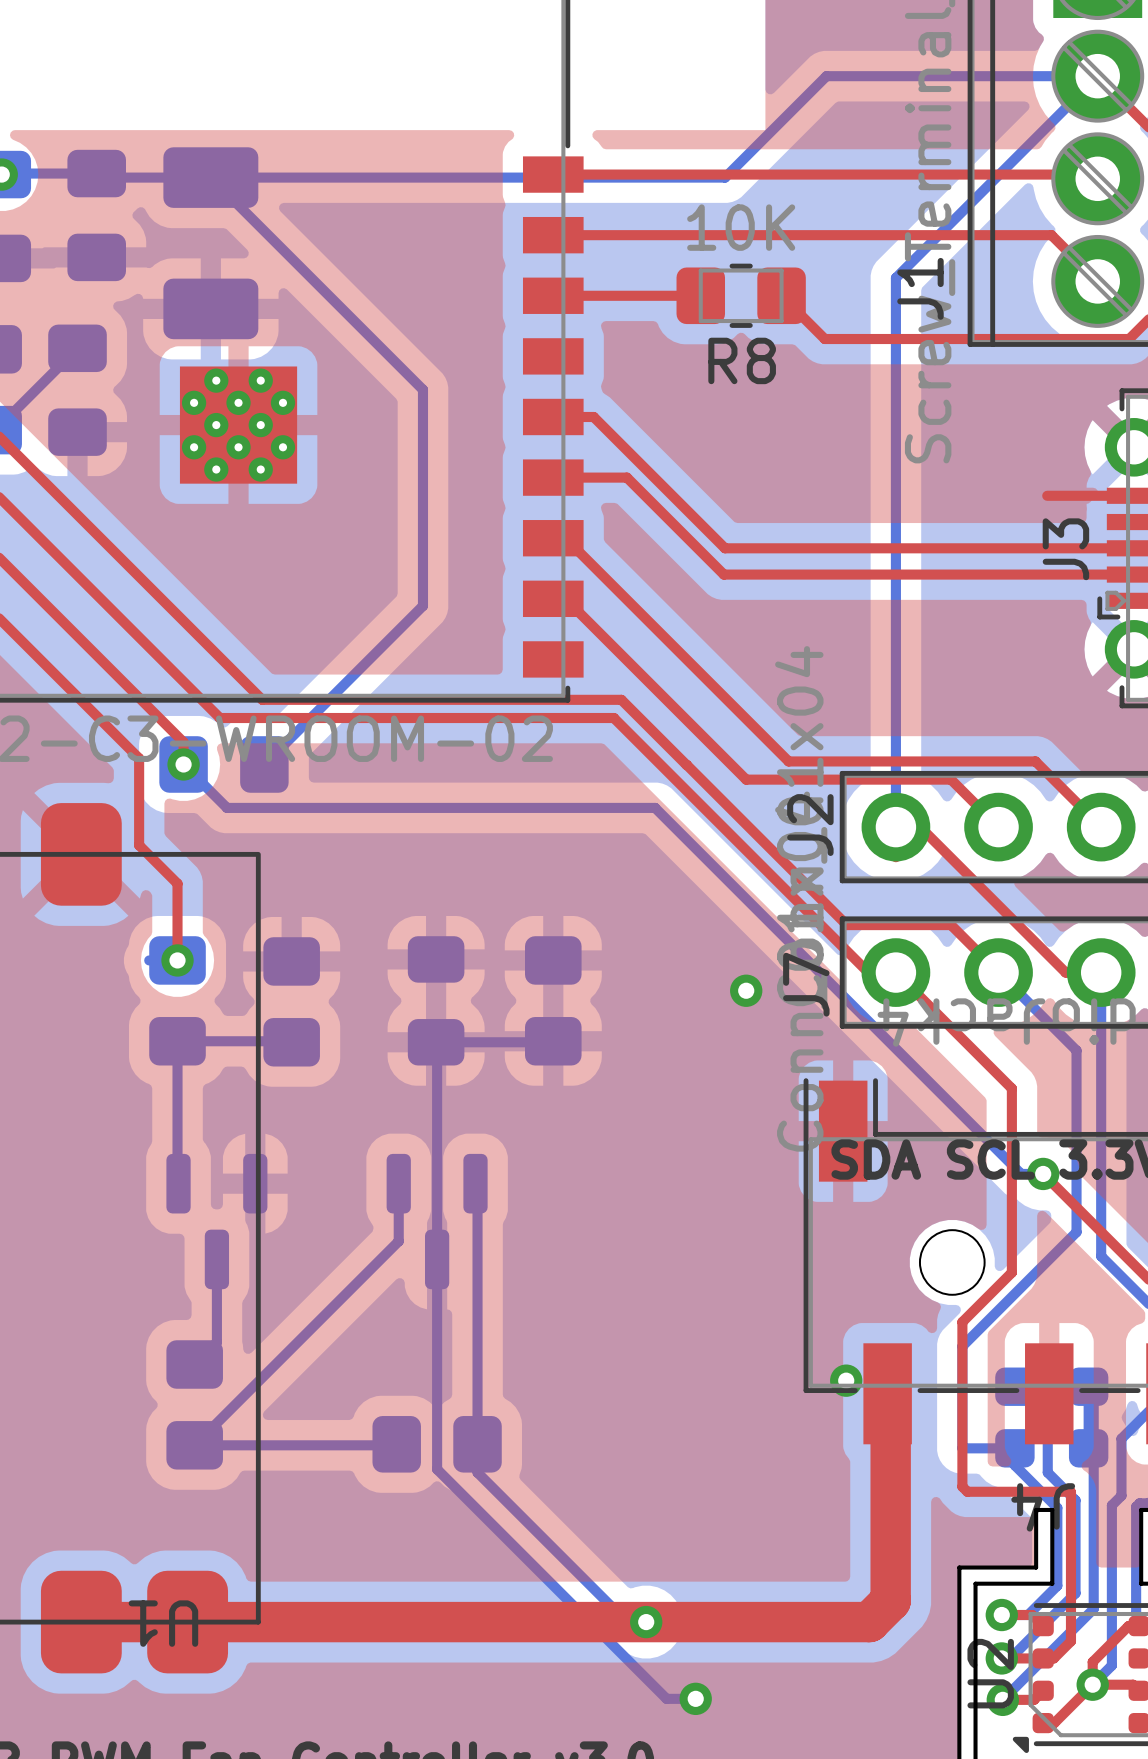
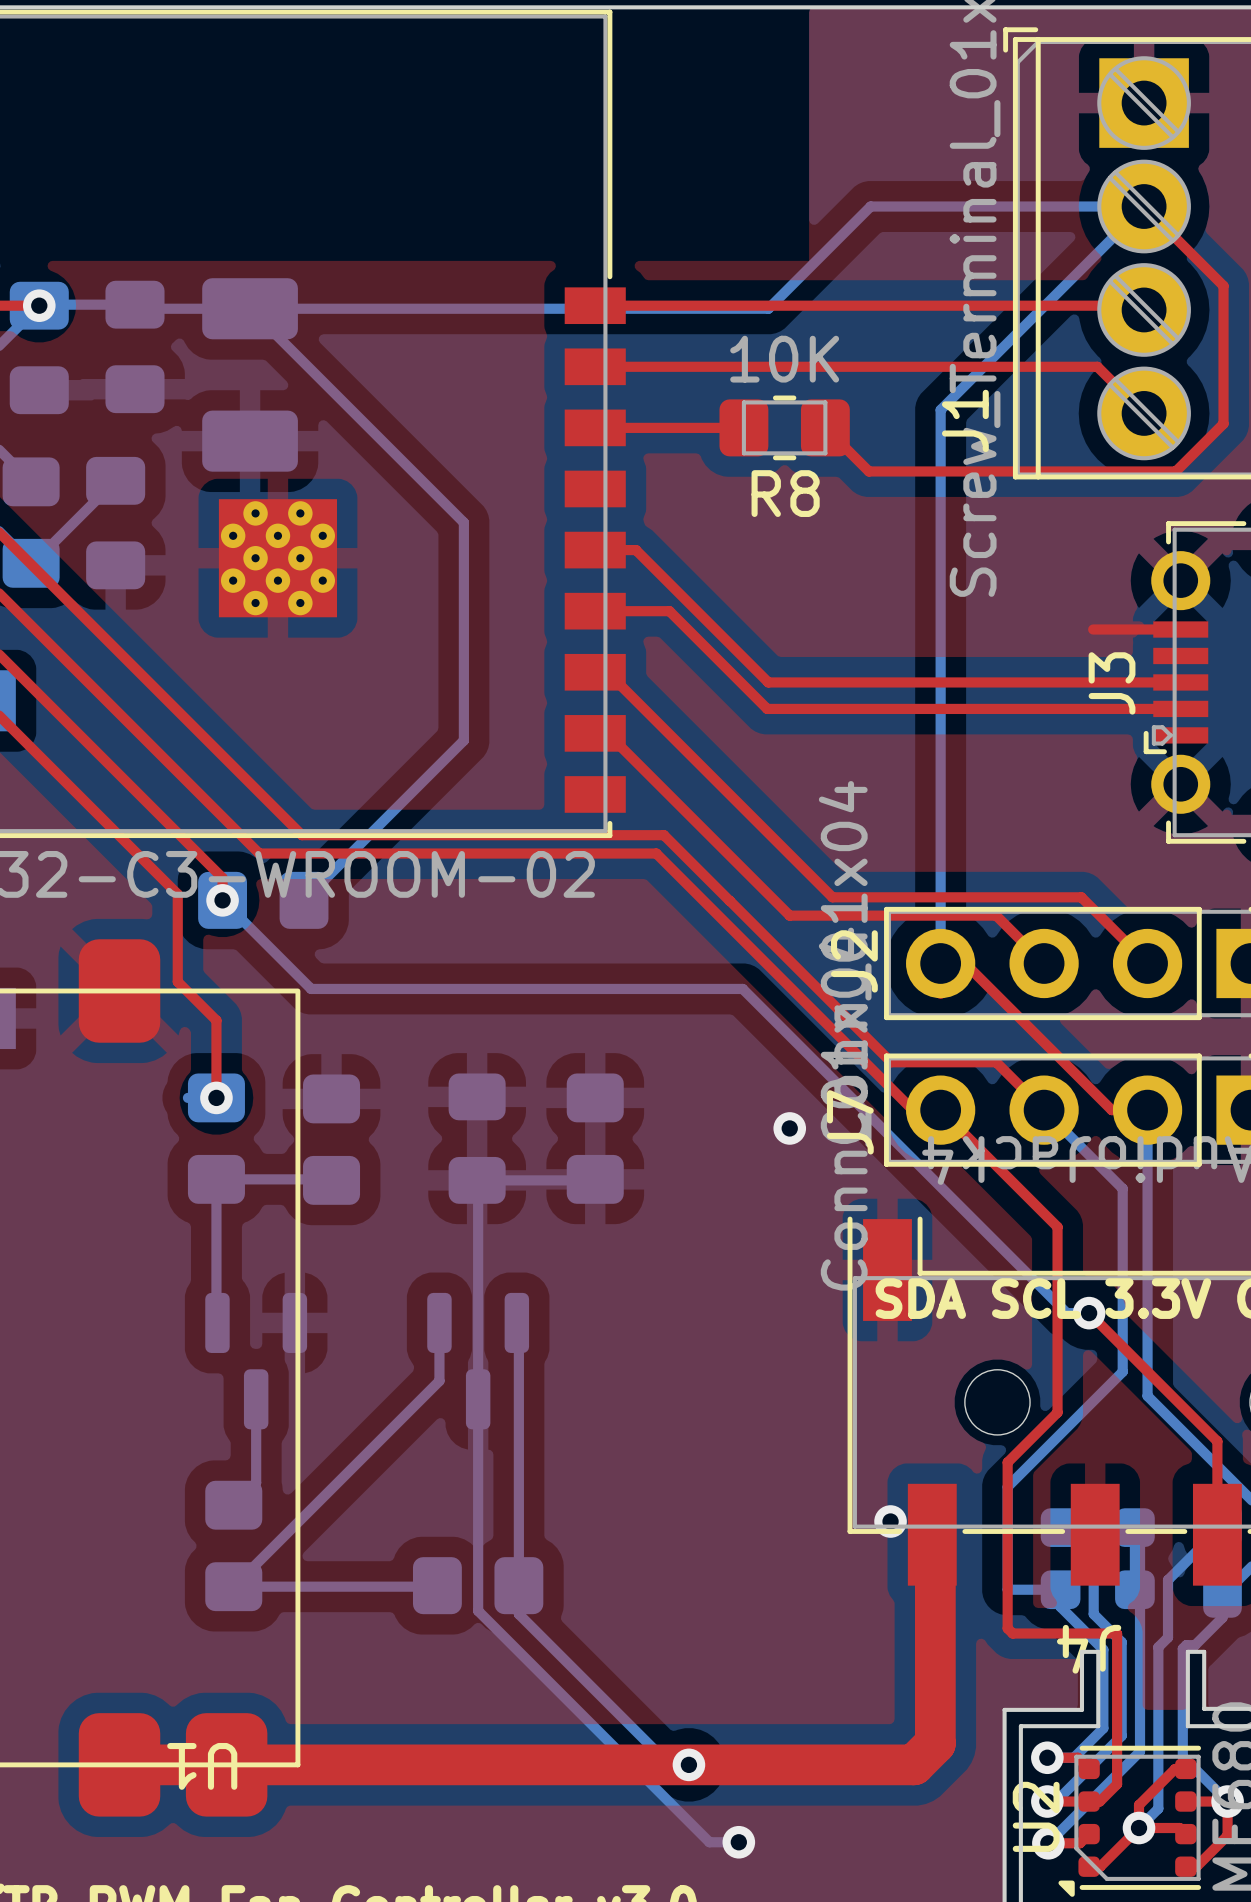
bottom track: (227, 807) (655, 807) (699, 852) -> (266, 944) (311, 988) (742, 988)

